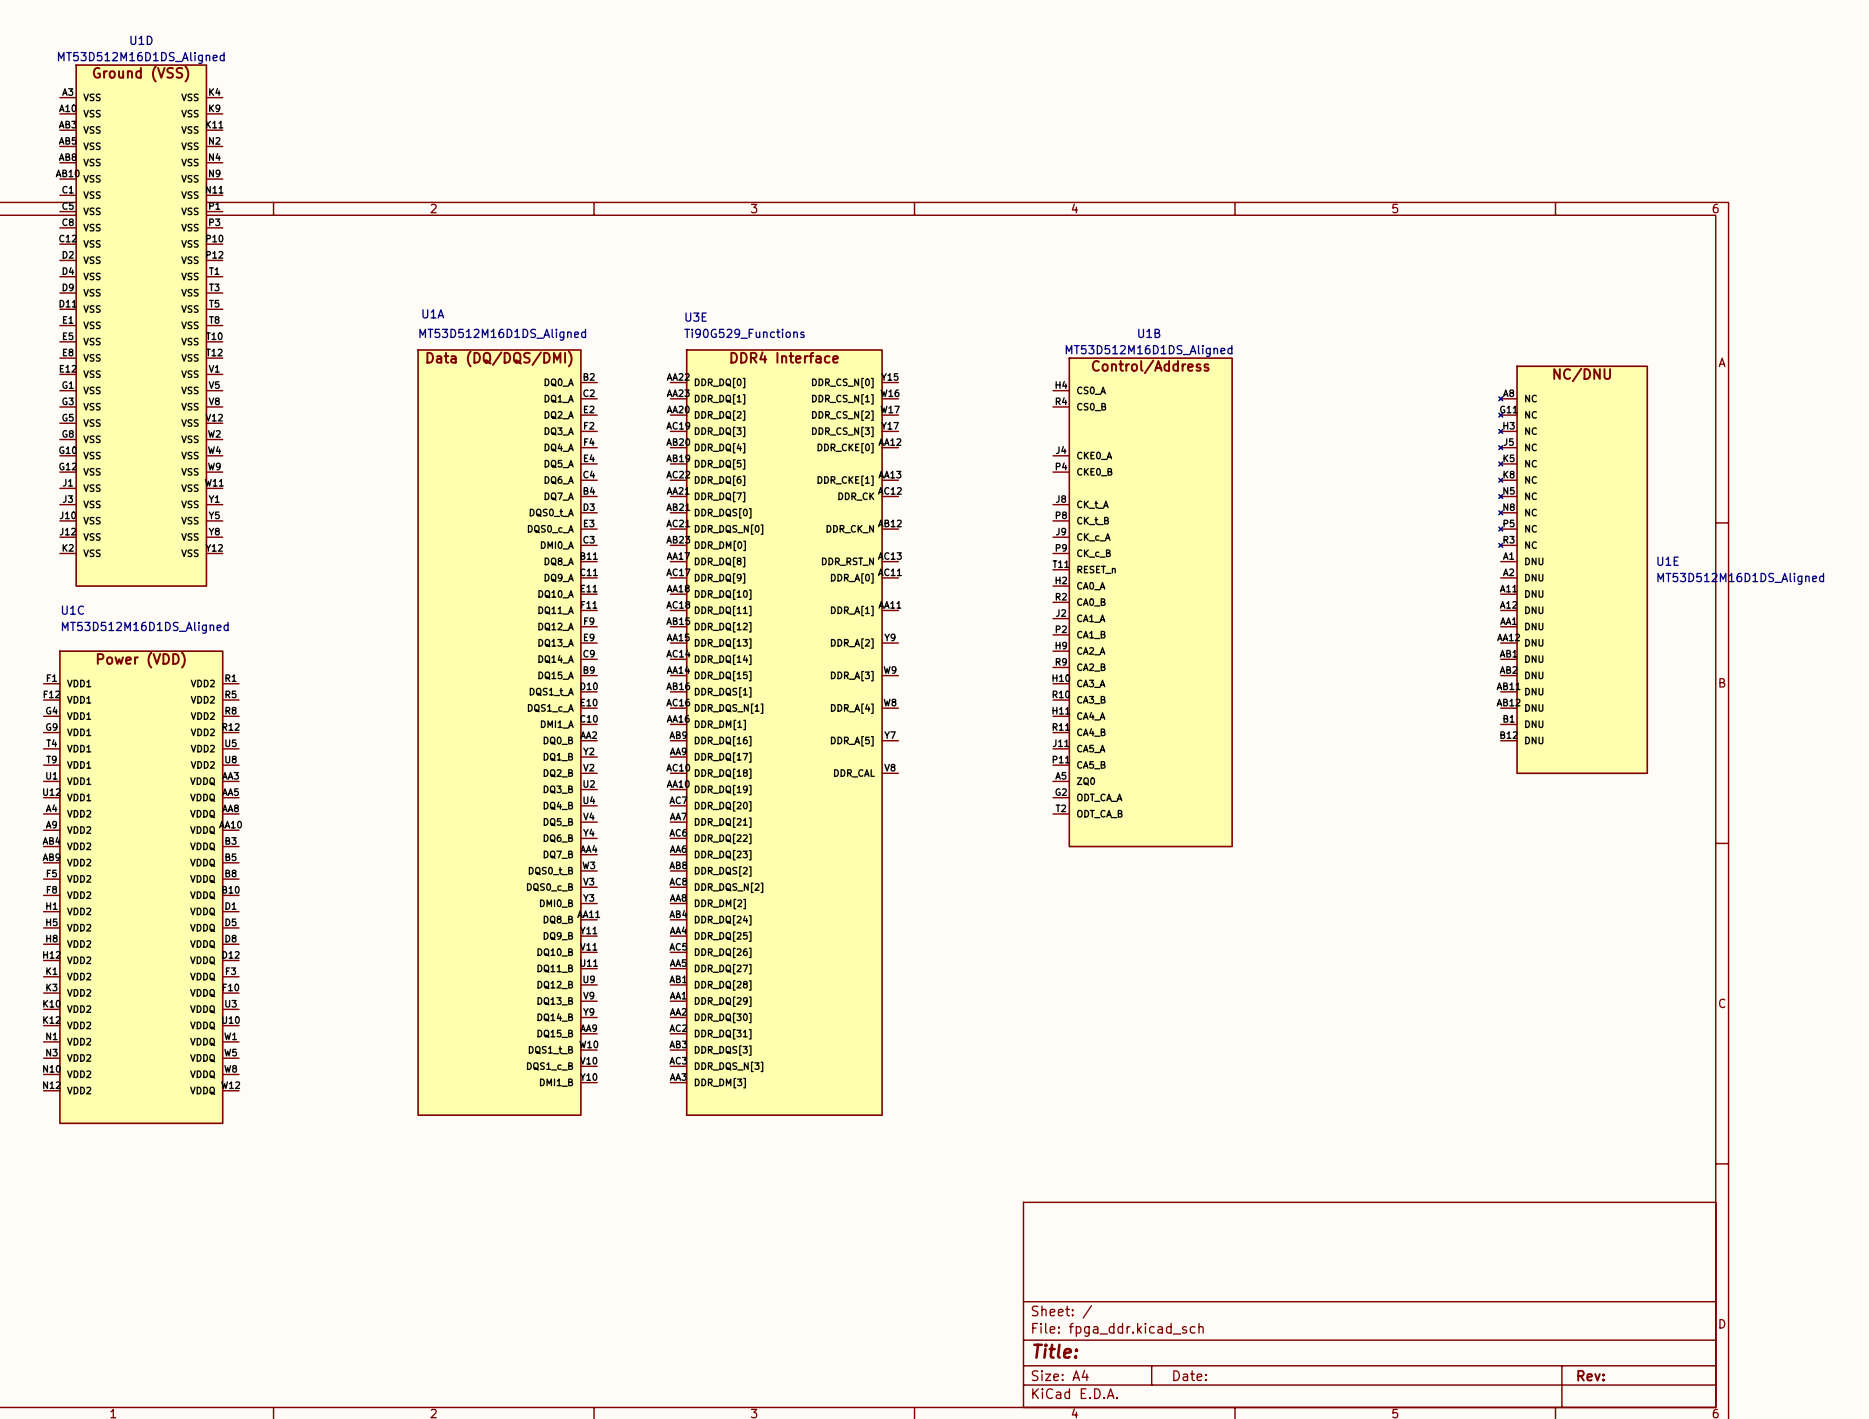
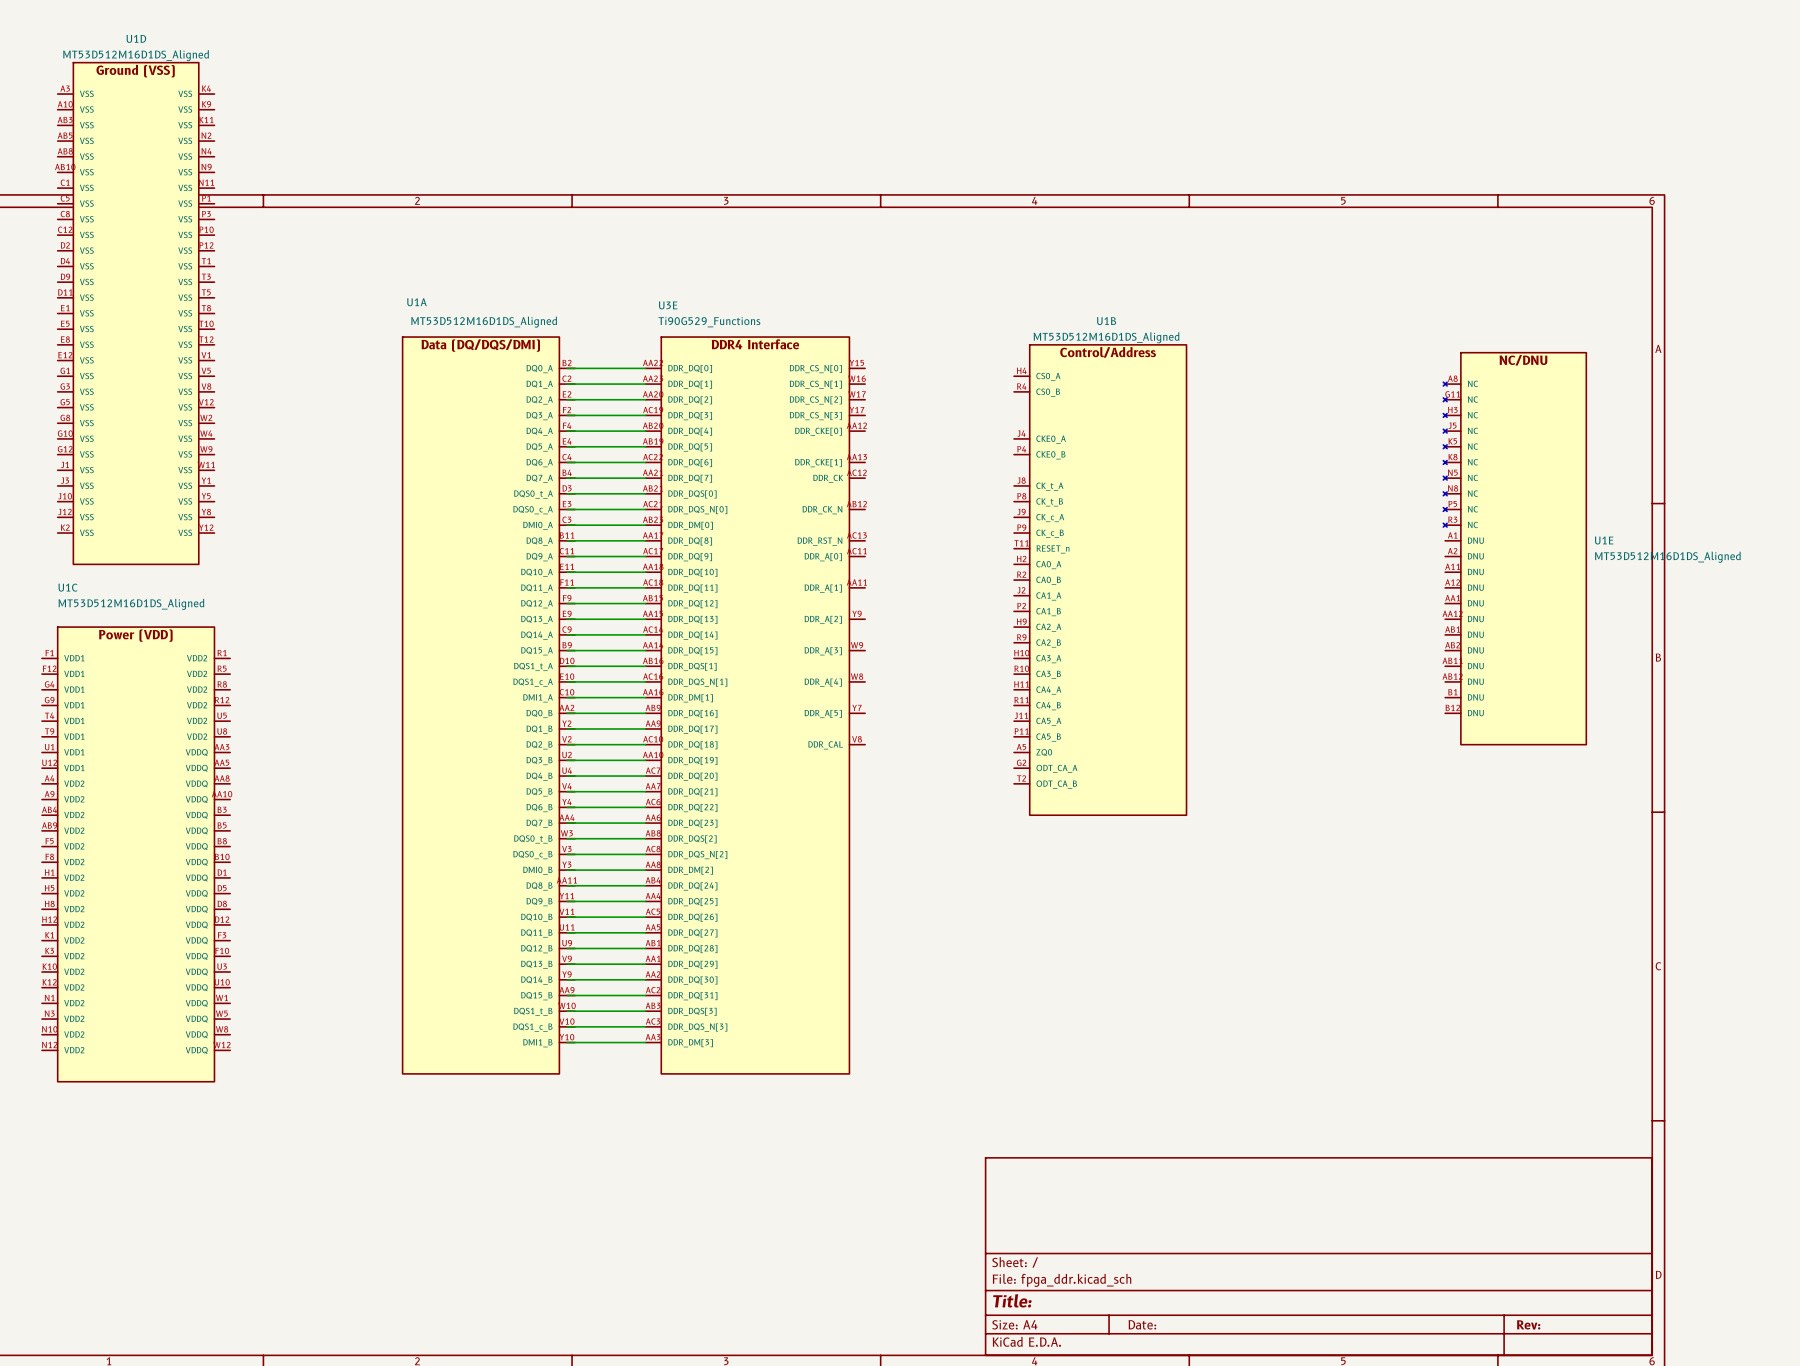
wire: none -> (567, 368) (645, 368)
wire: none -> (567, 384) (645, 384)
wire: none -> (567, 399) (645, 399)
wire: none -> (567, 415) (645, 415)
wire: none -> (567, 431) (645, 431)
wire: none -> (567, 446) (645, 446)
wire: none -> (567, 462) (645, 462)
wire: none -> (567, 478) (645, 478)
wire: none -> (567, 493) (645, 493)
wire: none -> (567, 509) (645, 509)
wire: none -> (567, 525) (645, 525)
wire: none -> (567, 540) (645, 540)
wire: none -> (567, 556) (645, 556)
wire: none -> (567, 572) (645, 572)
wire: none -> (567, 587) (645, 587)
wire: none -> (567, 603) (645, 603)
wire: none -> (567, 619) (645, 619)
wire: none -> (567, 634) (645, 634)
wire: none -> (567, 650) (645, 650)
wire: none -> (567, 666) (645, 666)
wire: none -> (567, 681) (645, 681)
wire: none -> (567, 697) (645, 697)
wire: none -> (567, 713) (645, 713)
wire: none -> (567, 728) (645, 728)
wire: none -> (567, 744) (645, 744)
wire: none -> (567, 760) (645, 760)
wire: none -> (567, 776) (645, 776)
wire: none -> (567, 791) (645, 791)
wire: none -> (567, 807) (645, 807)
wire: none -> (567, 823) (645, 823)
wire: none -> (567, 838) (645, 838)
wire: none -> (567, 854) (645, 854)
wire: none -> (567, 870) (645, 870)
wire: none -> (567, 885) (645, 885)
wire: none -> (567, 901) (645, 901)
wire: none -> (567, 917) (645, 917)
wire: none -> (567, 932) (645, 932)
wire: none -> (567, 948) (645, 948)
wire: none -> (567, 964) (645, 964)
wire: none -> (567, 979) (645, 979)
wire: none -> (567, 995) (645, 995)
wire: none -> (567, 1011) (645, 1011)
wire: none -> (567, 1026) (645, 1026)
wire: none -> (567, 1042) (645, 1042)

